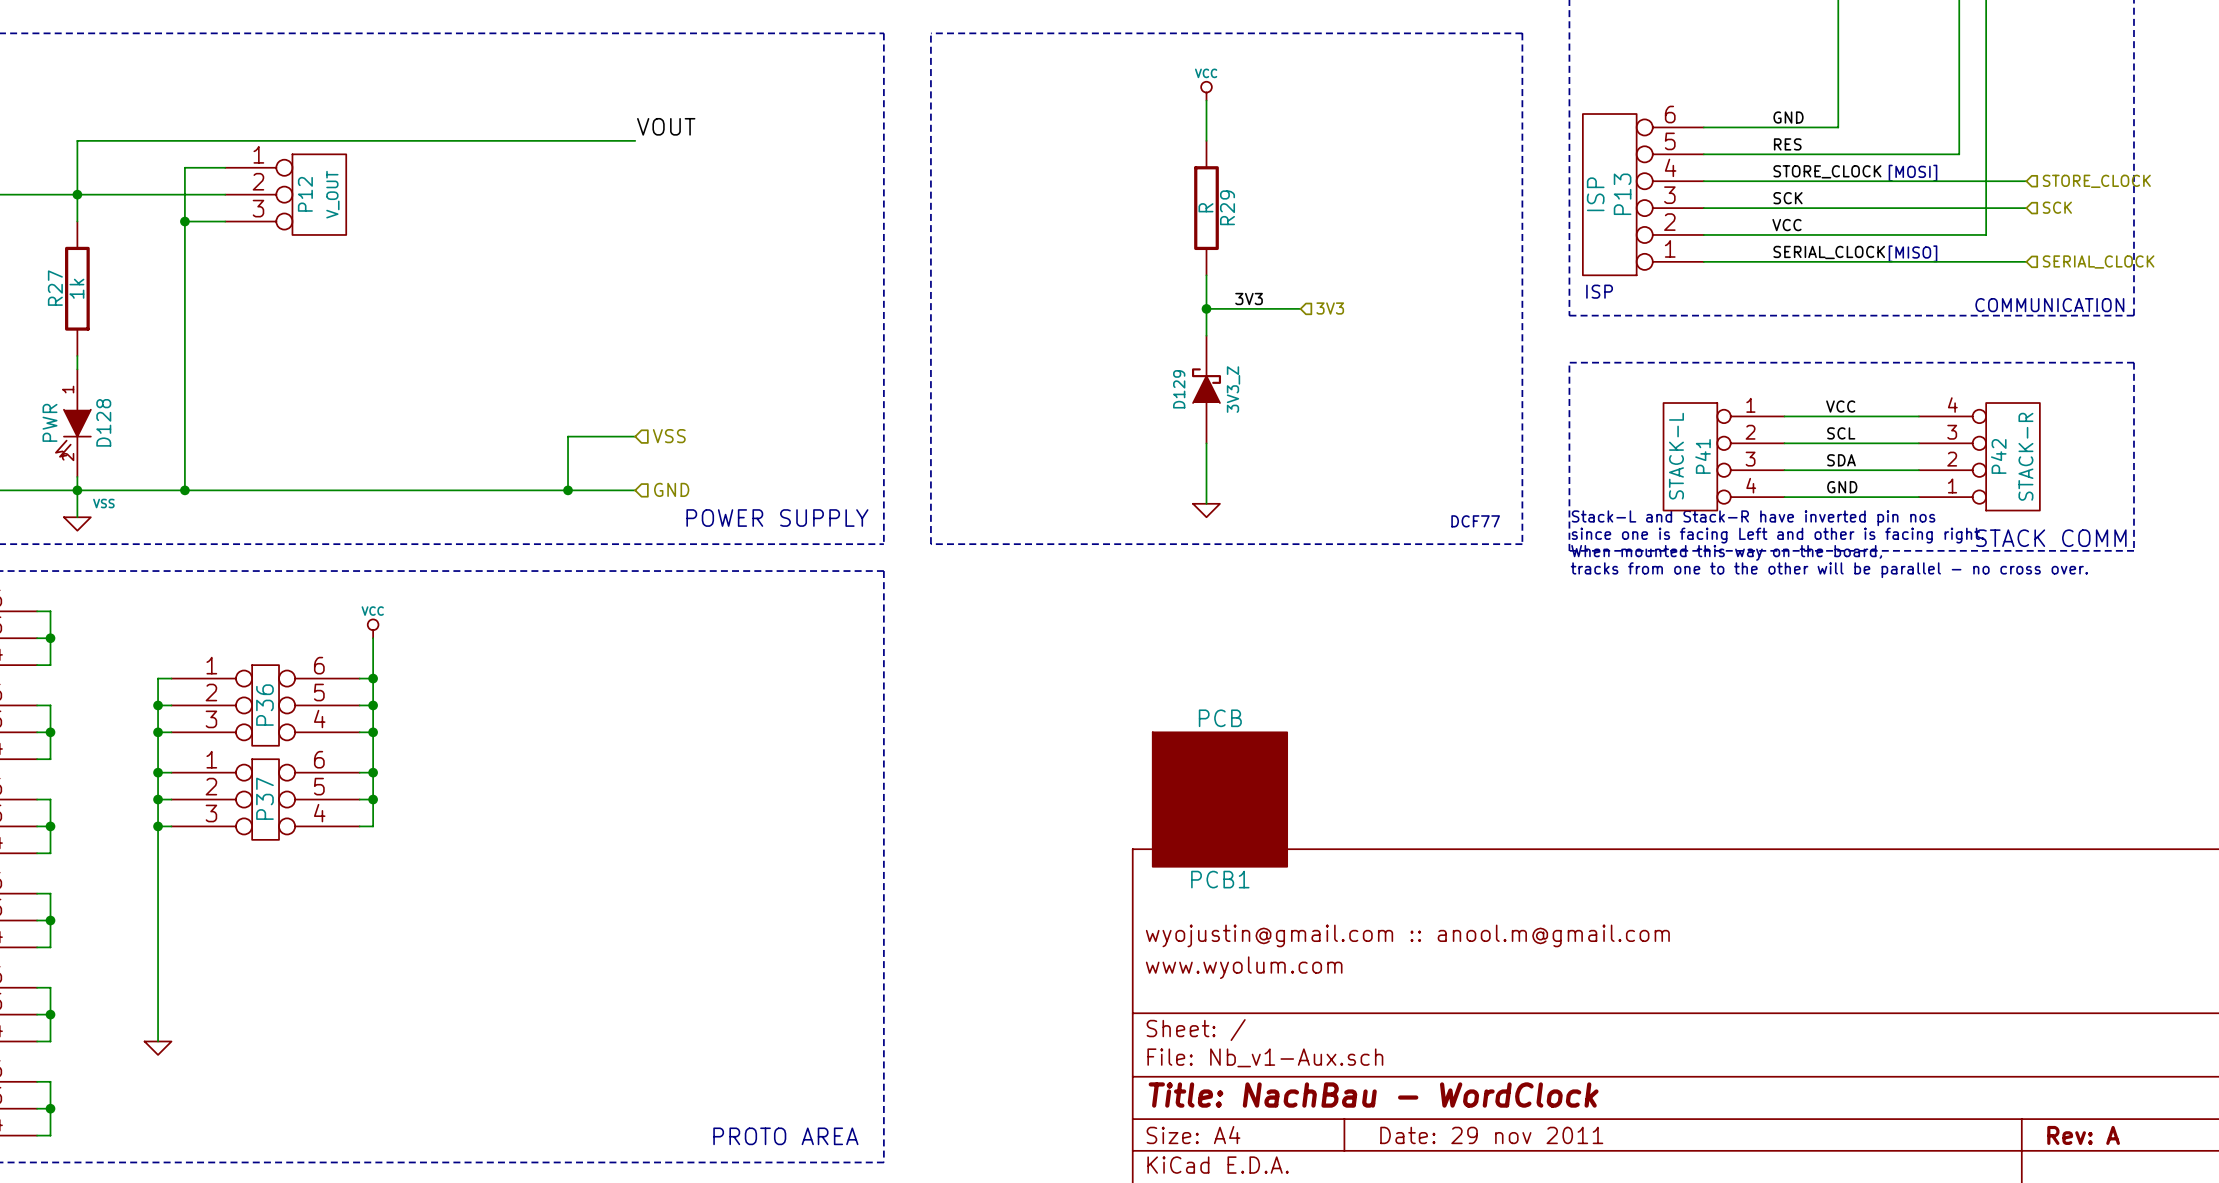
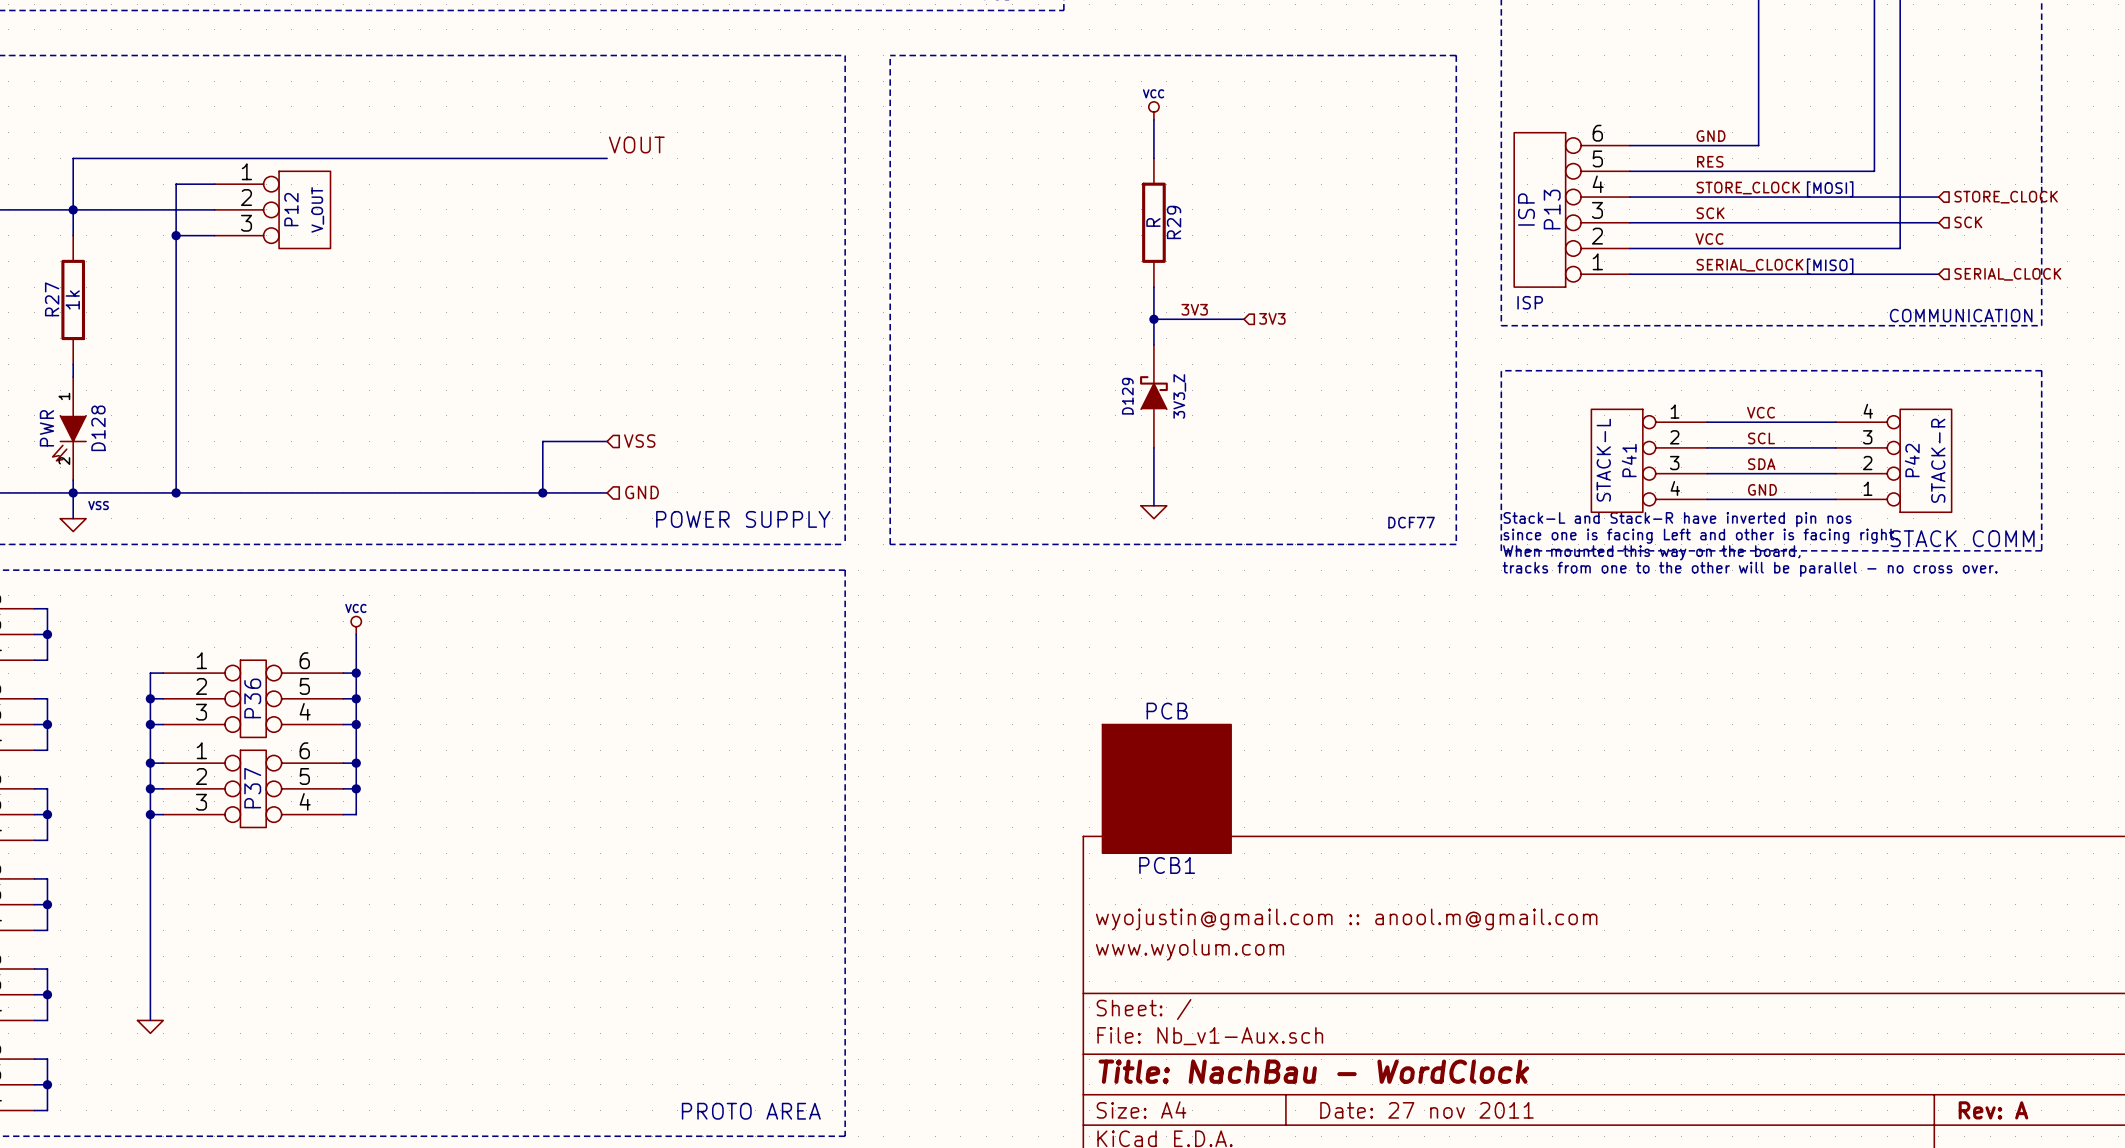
title block: Date: 29 nov 2011 (1491, 1135) -> Date: 27 nov 2011 (1426, 1110)

